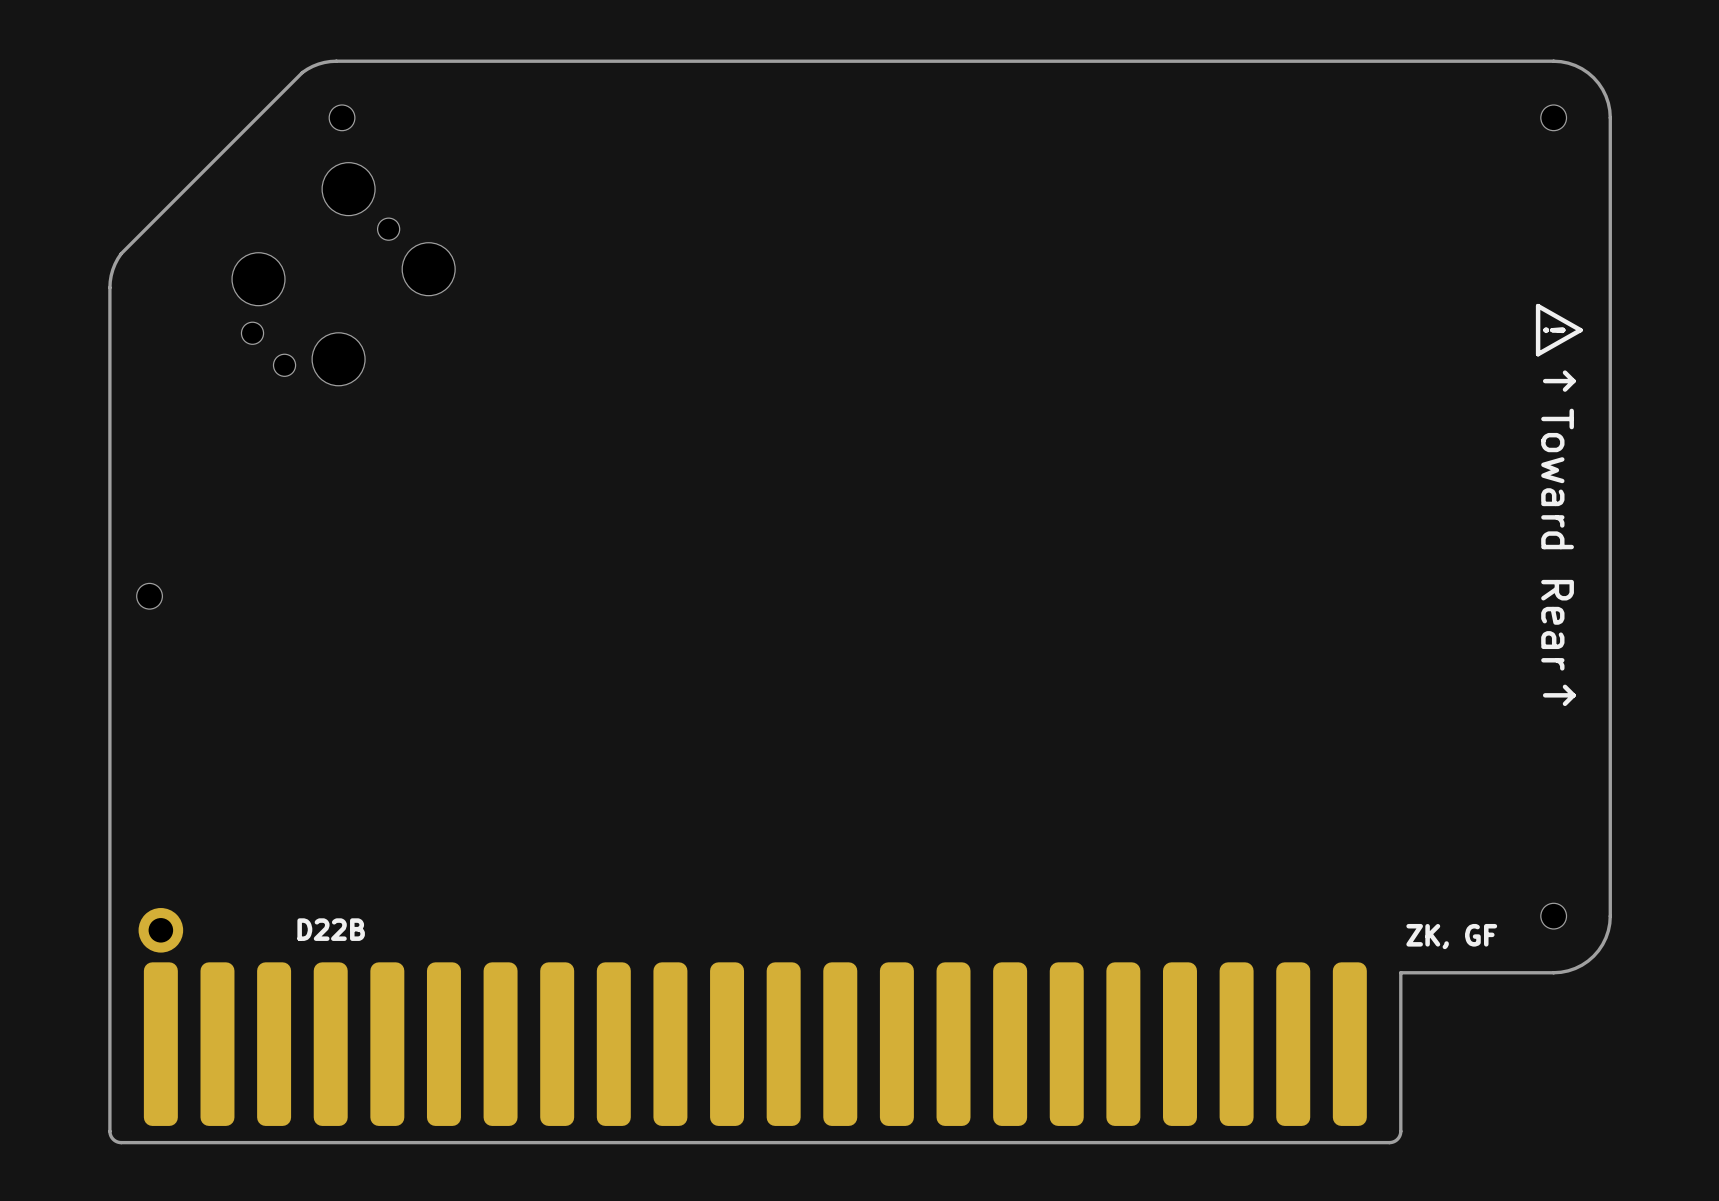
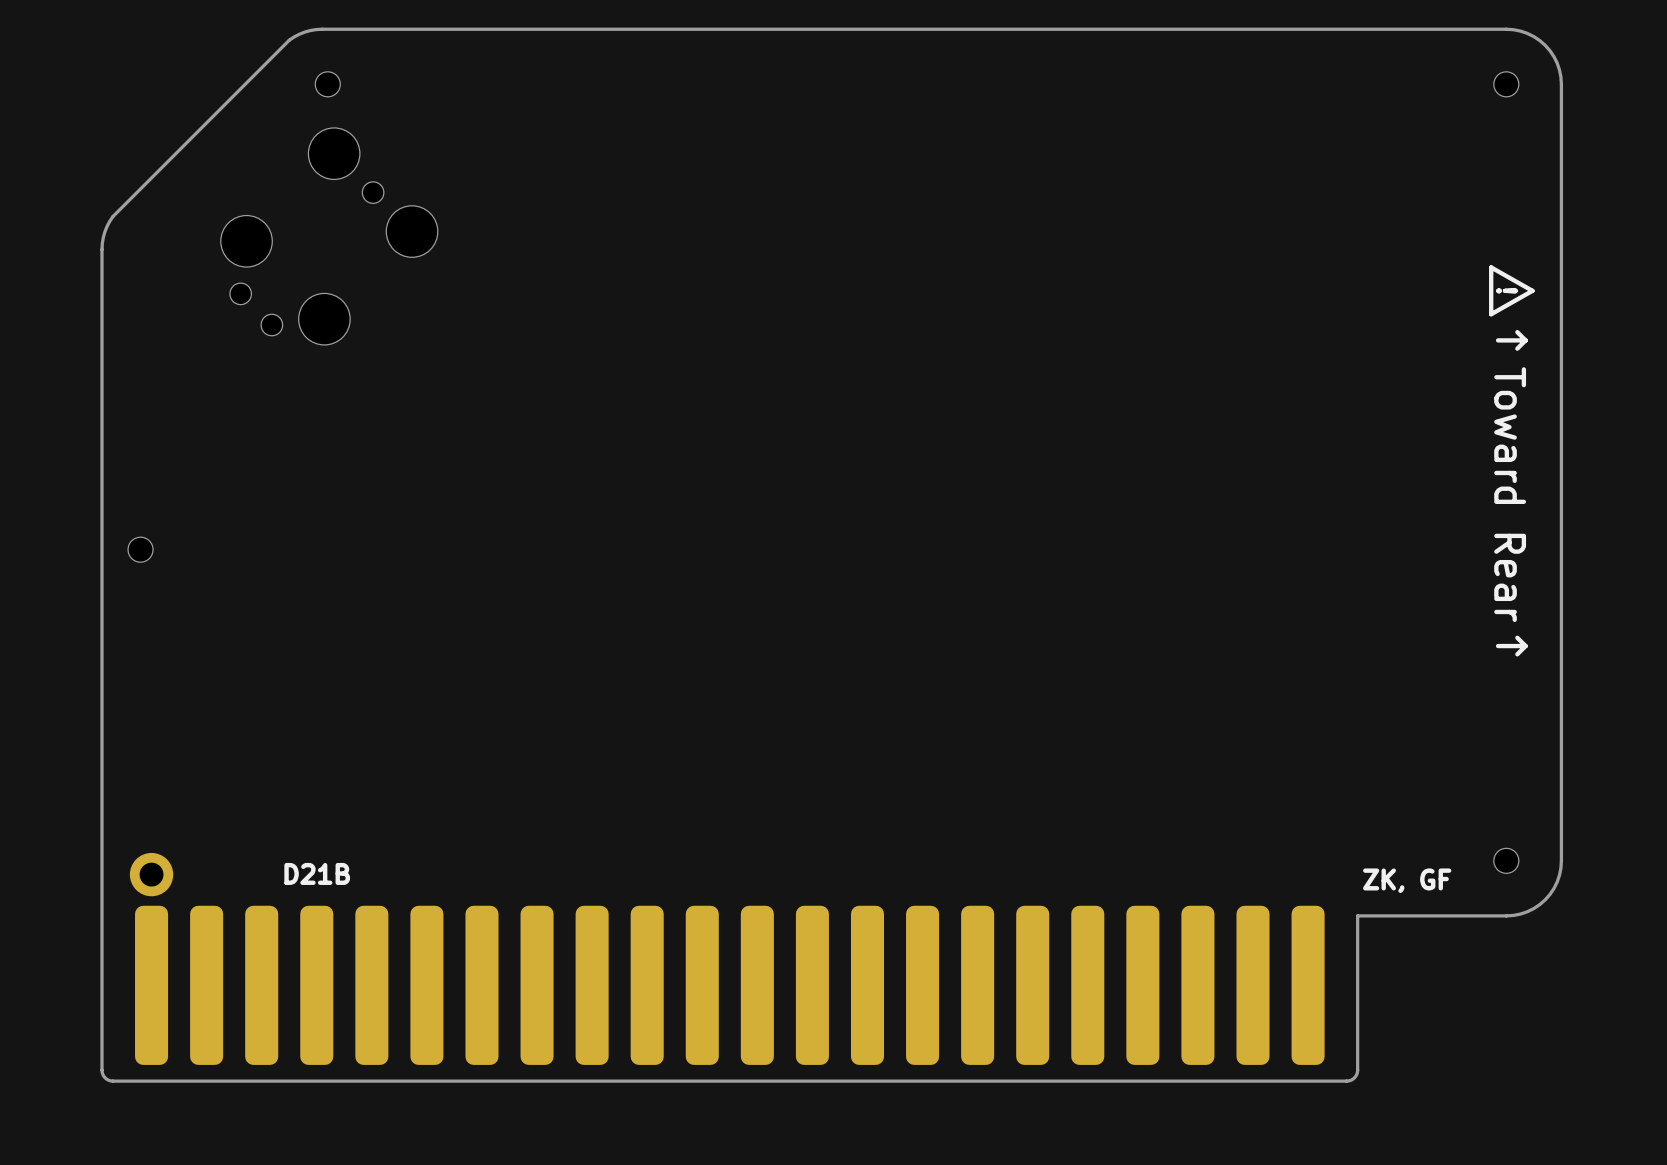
text: D22B (331, 929) -> D21B (317, 873)

